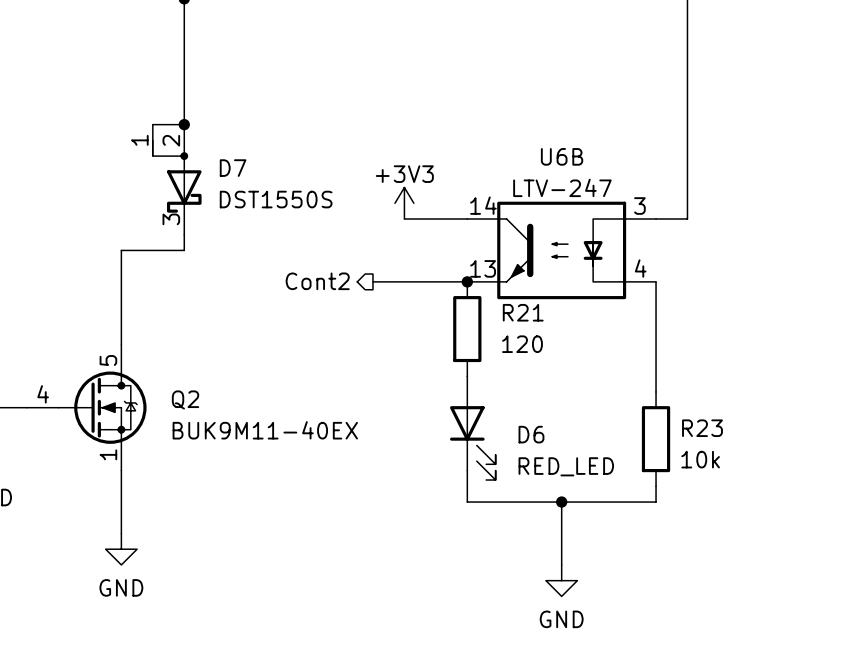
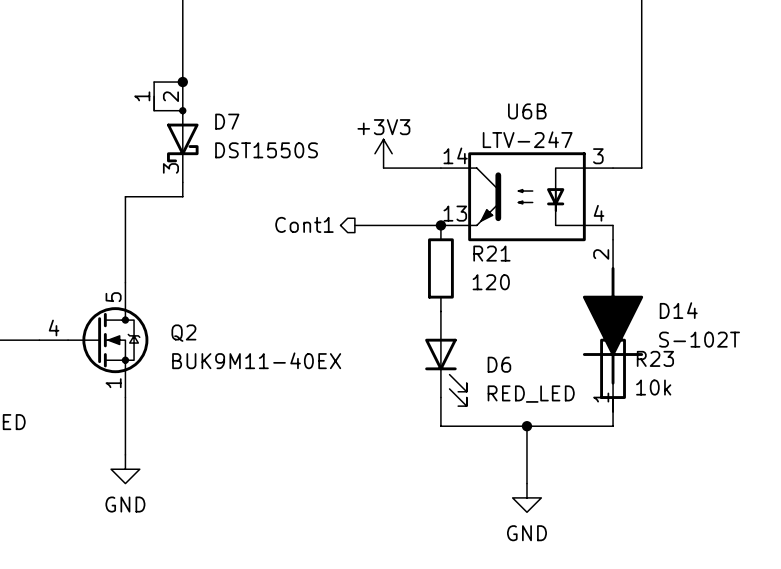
hierarchical label: Cont2 (317, 281) -> Cont1 (304, 224)
D14: none -> S-102T (613, 325)

